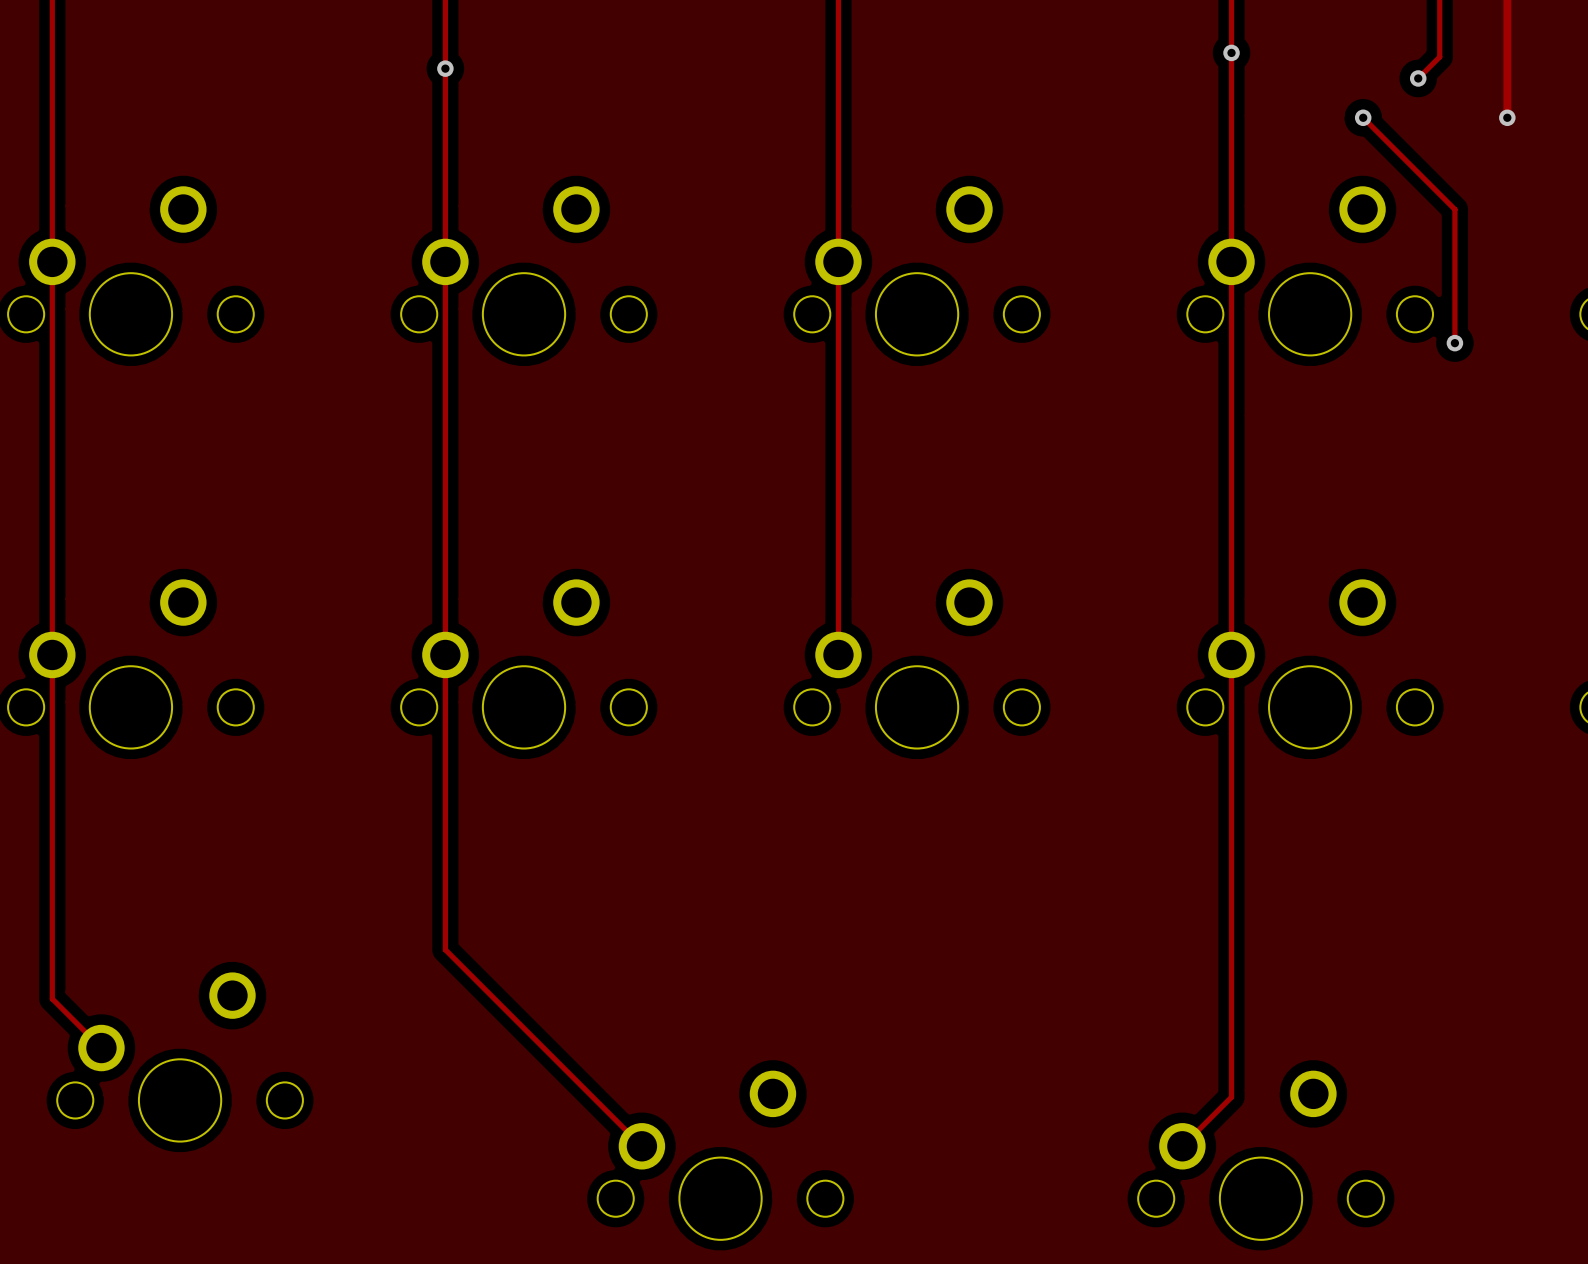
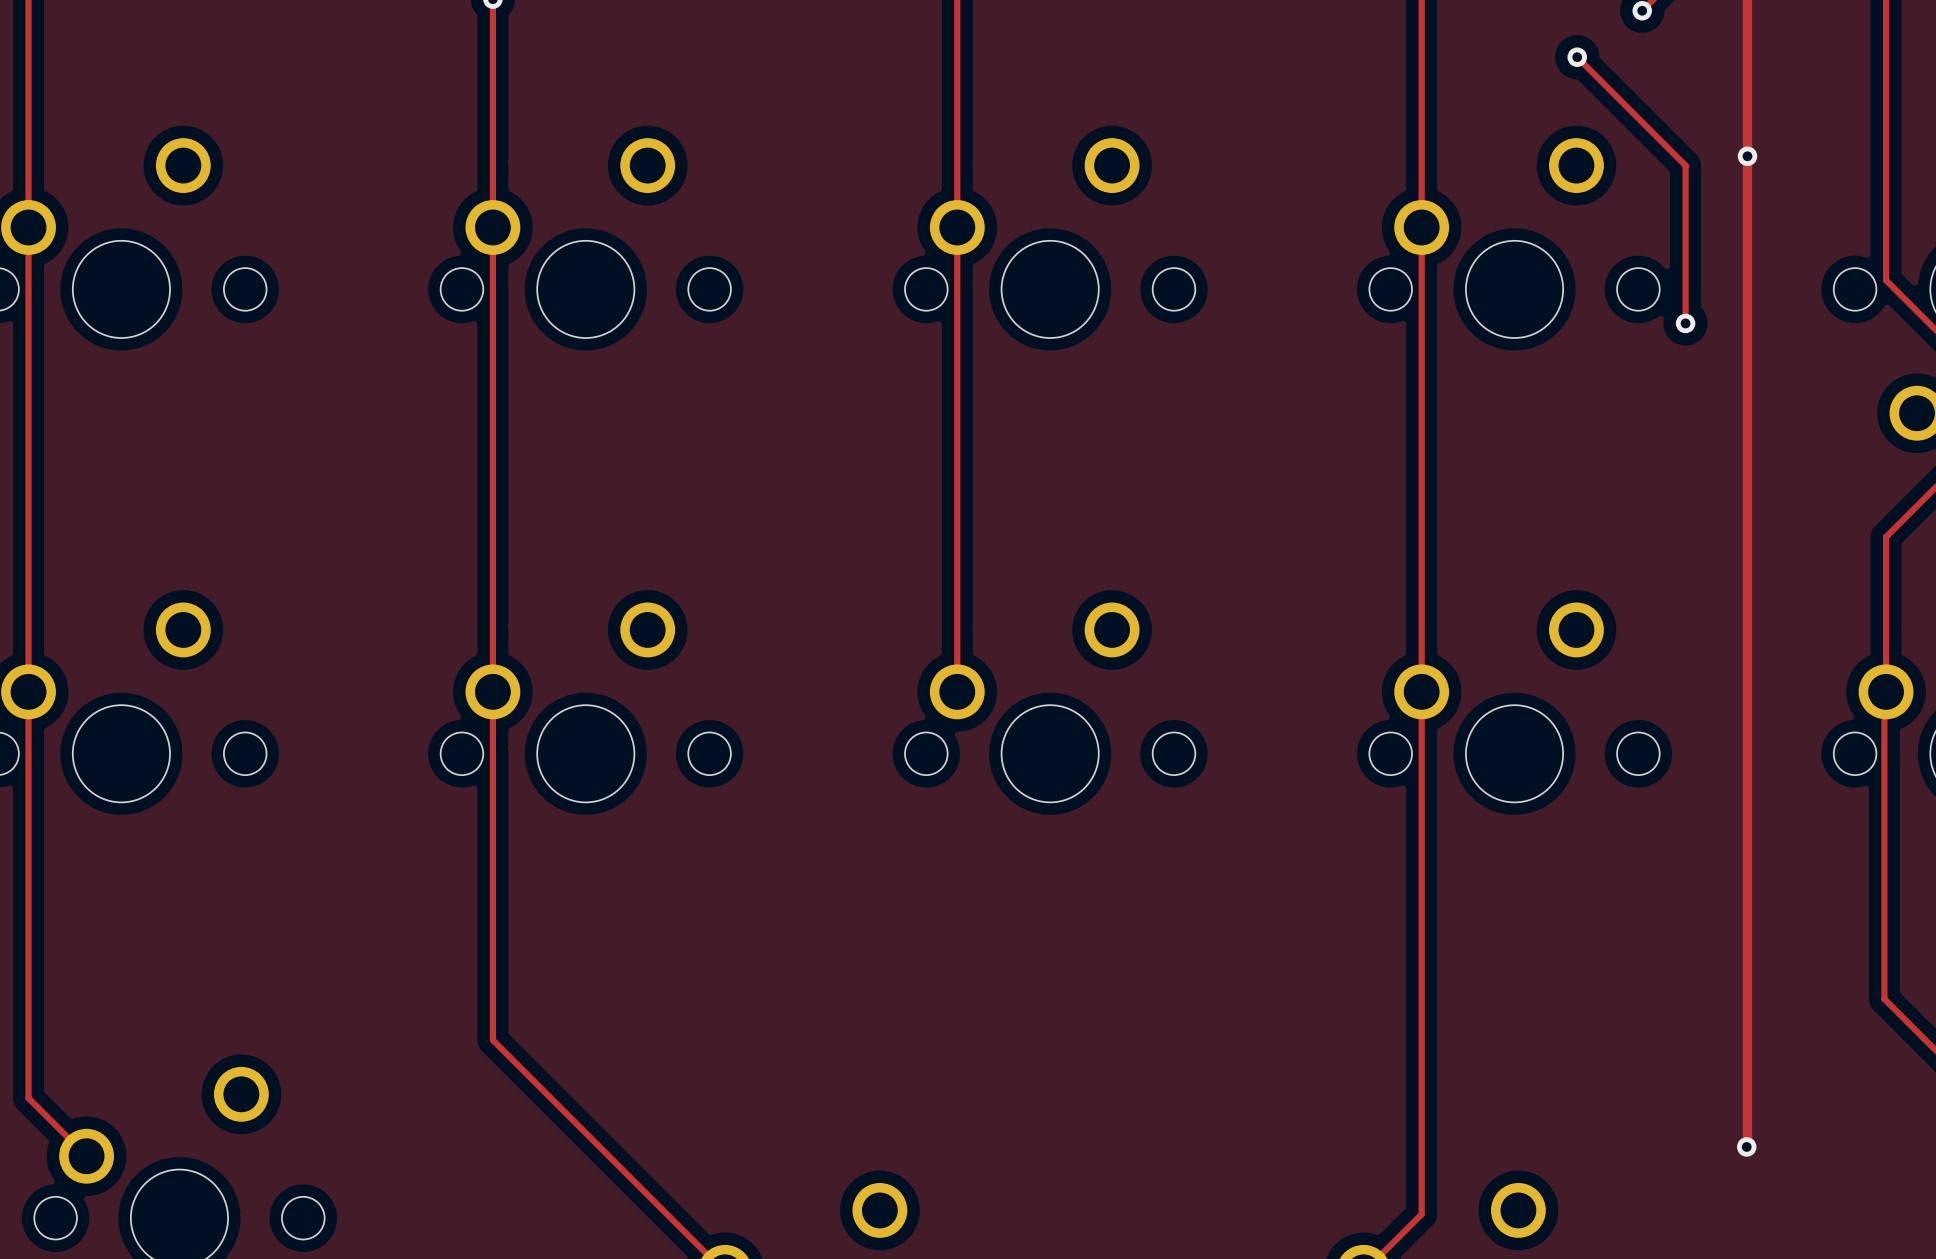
track: none -> (1747, 57) (1746, 1146)
via position: (1507, 117) -> (1747, 156)
via: none -> (1746, 1146)

